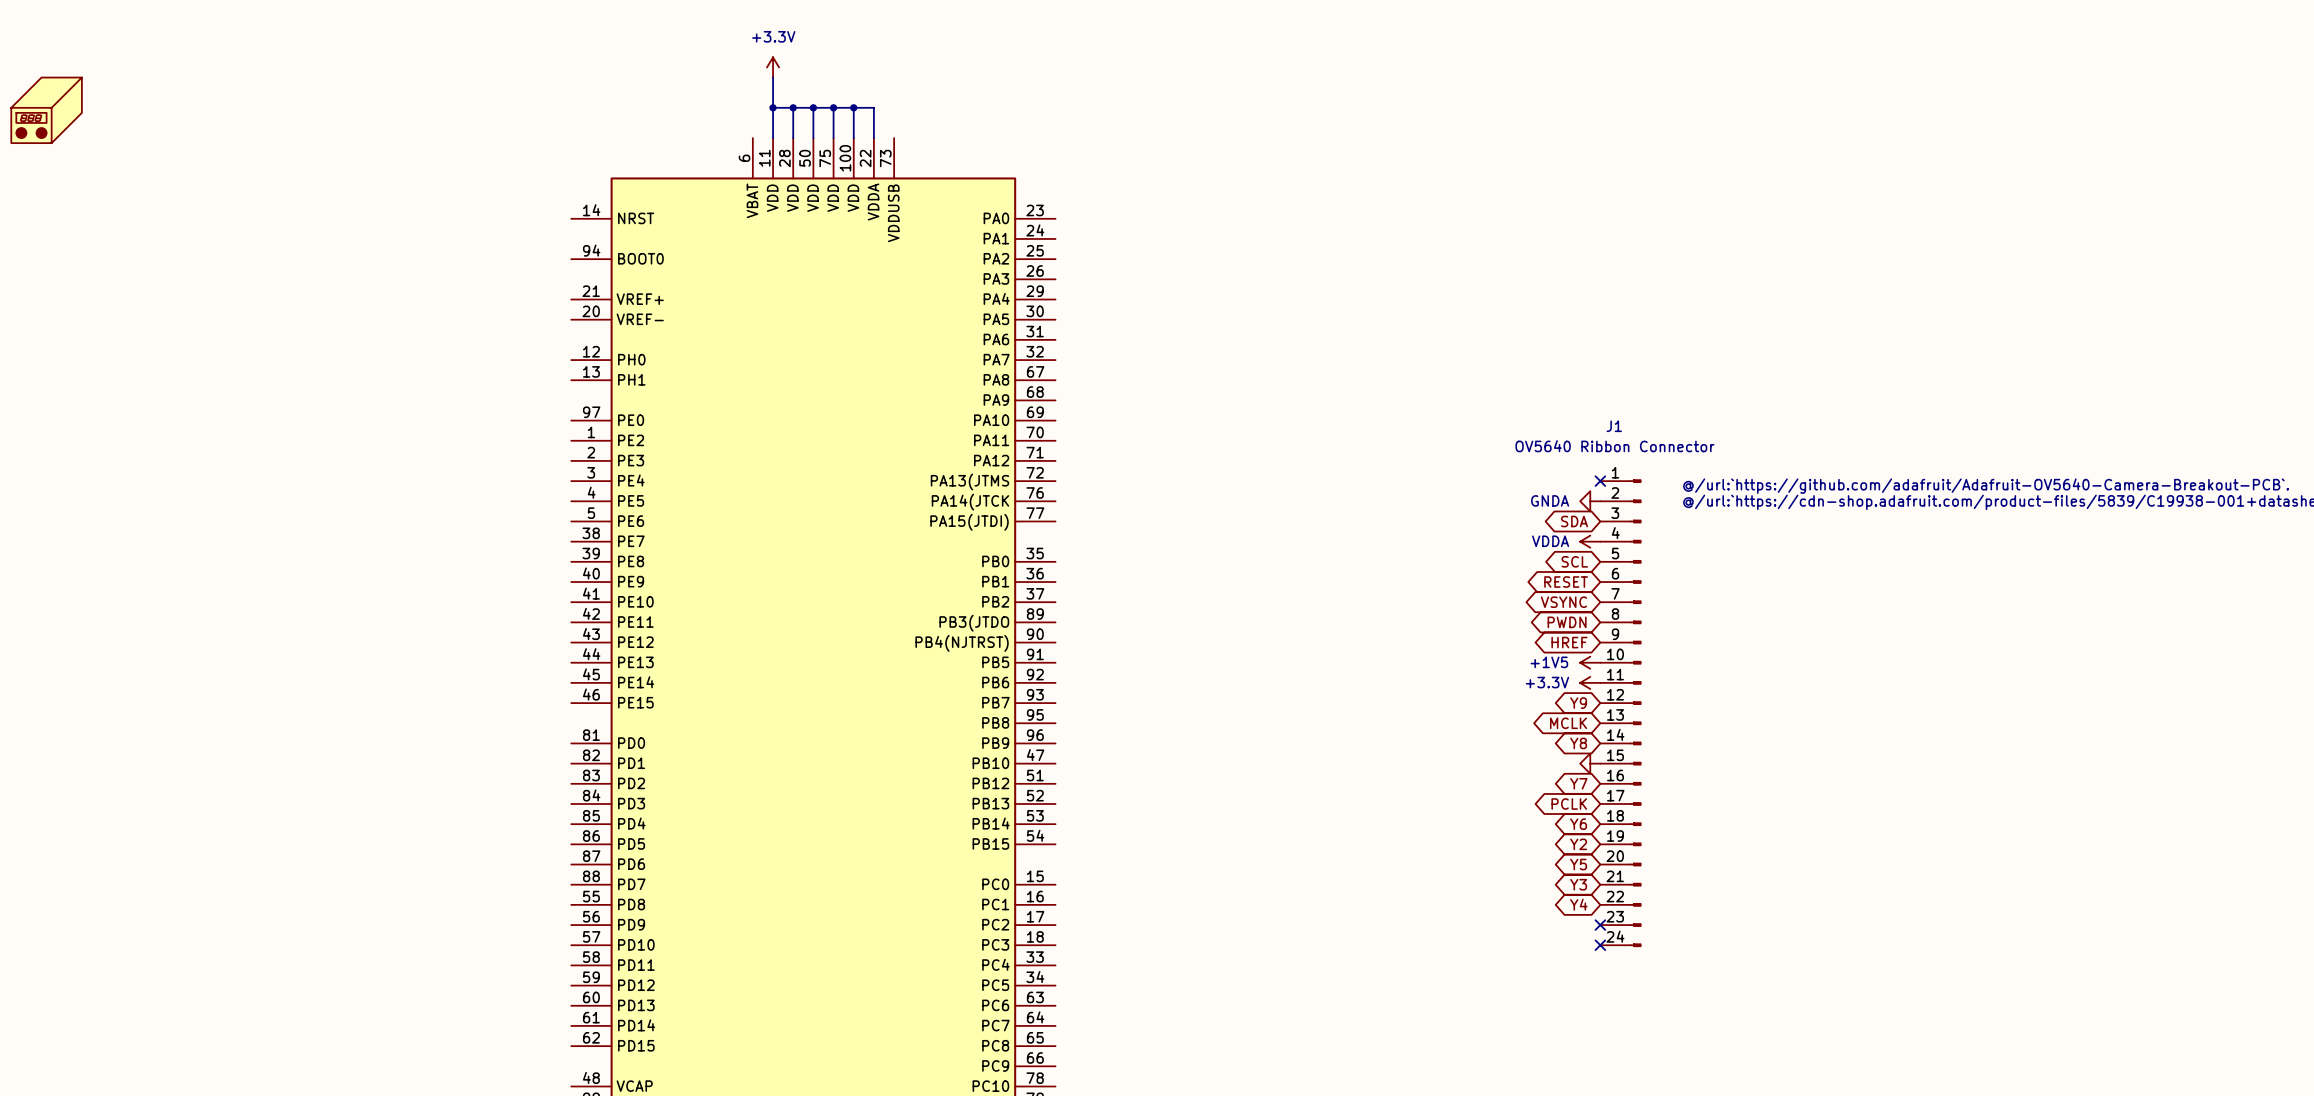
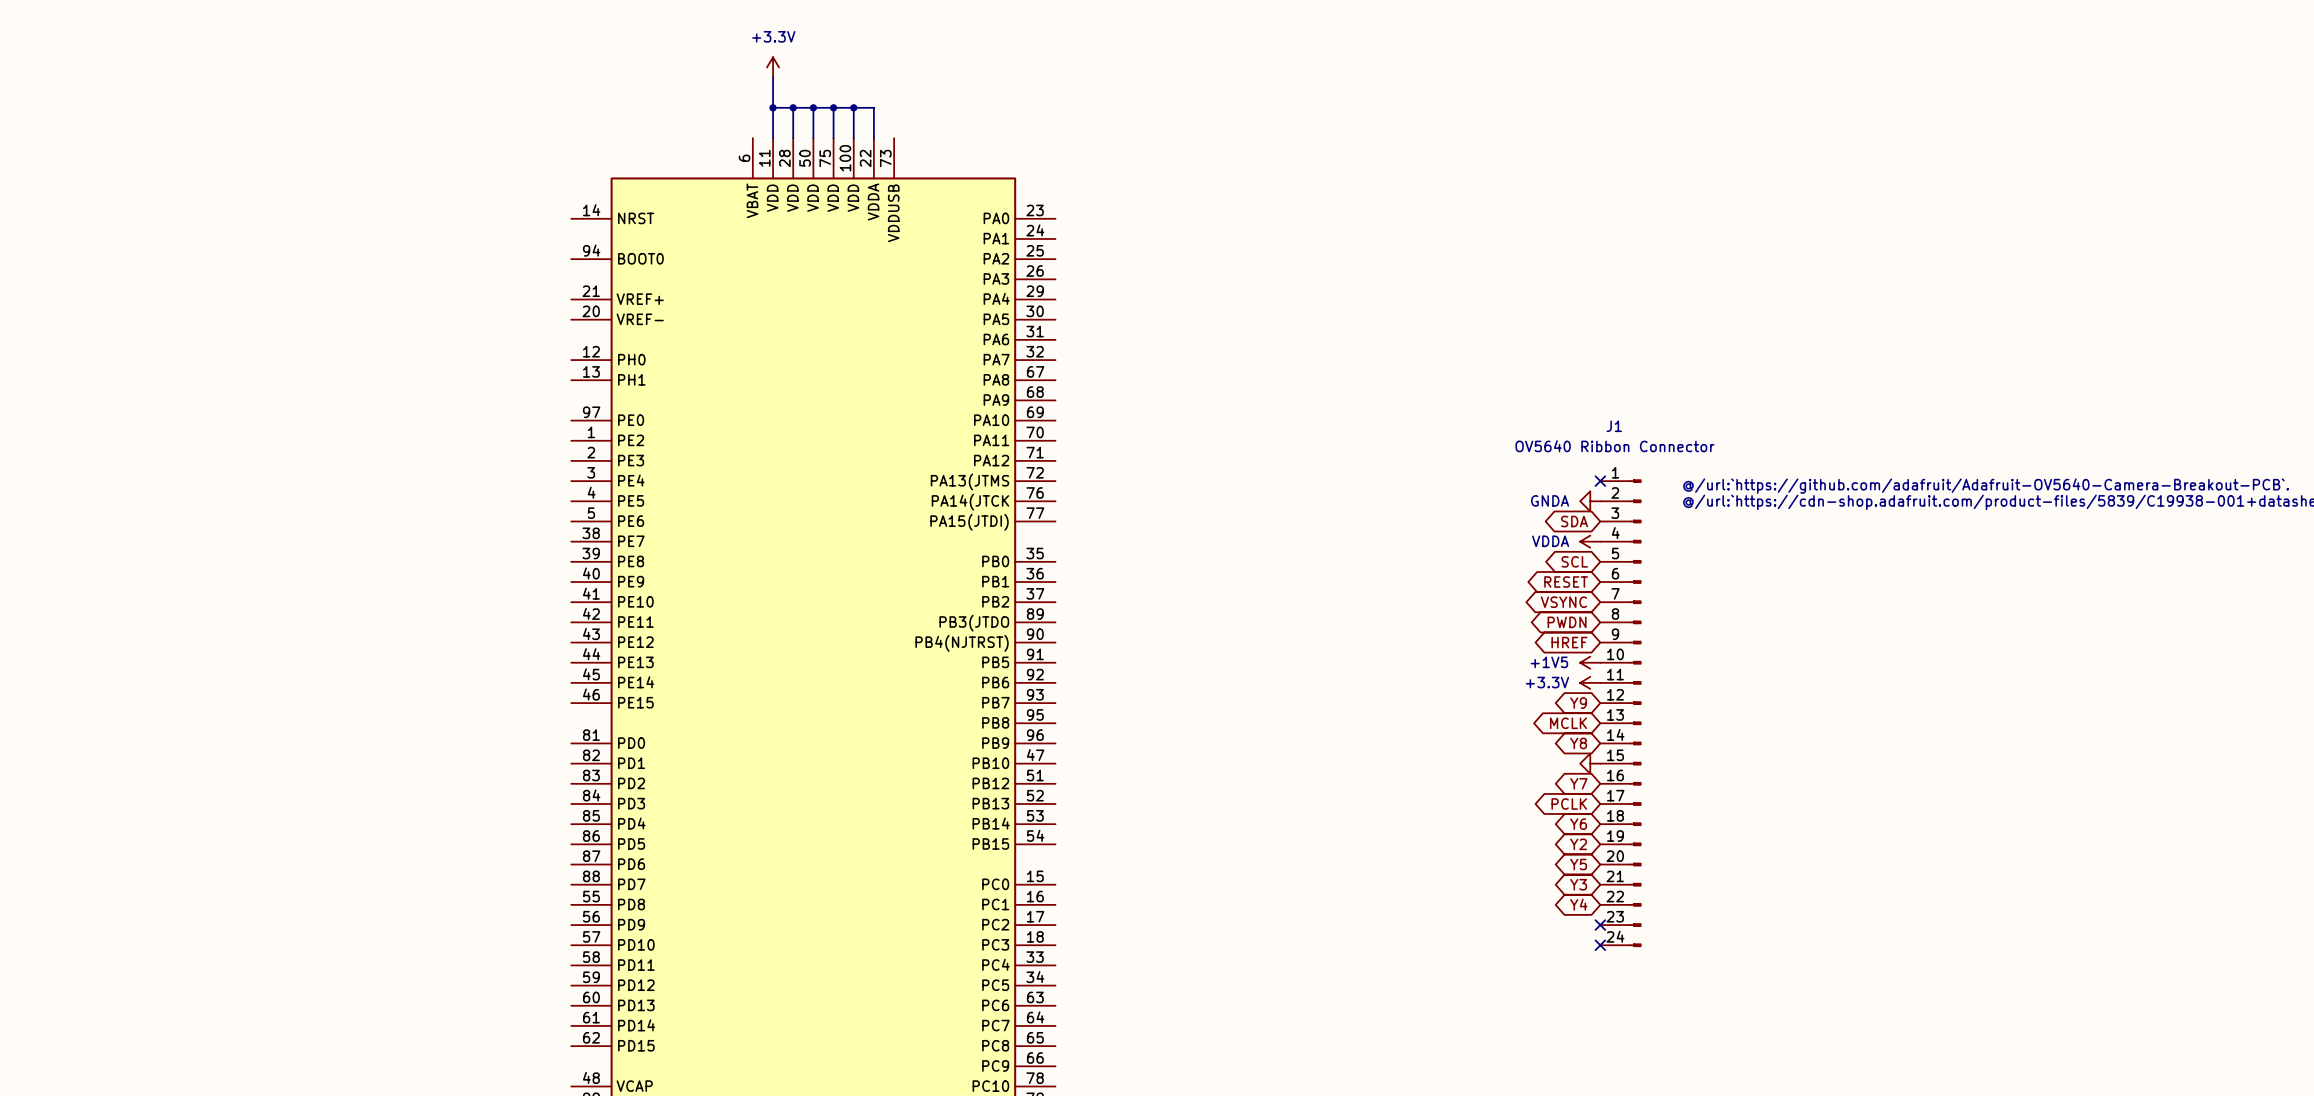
part: (46, 110) -> none

